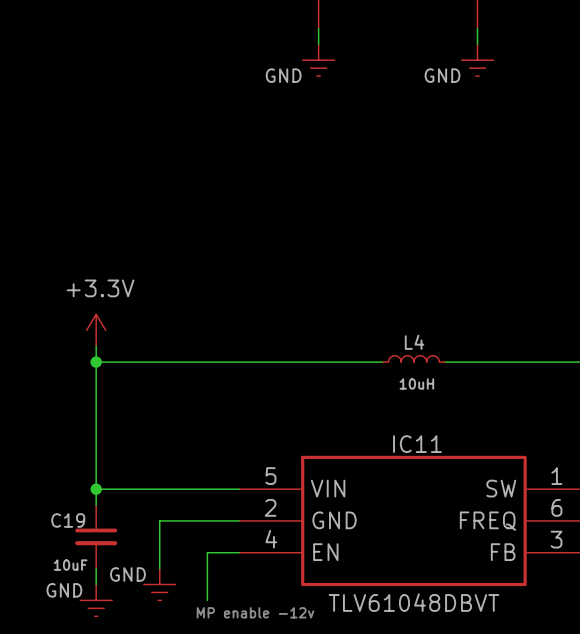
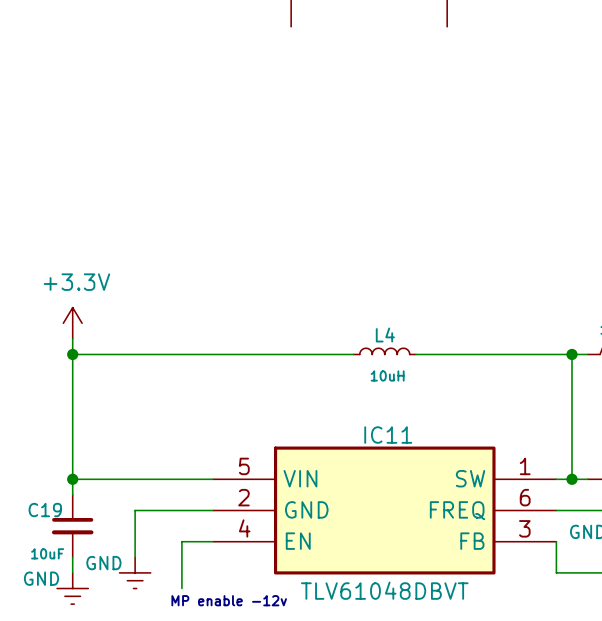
wire: (318, 28) (318, 44) -> none
wire: (477, 28) (477, 44) -> none
power symbol: GND (318, 60) -> none
power symbol: GND (477, 60) -> none

